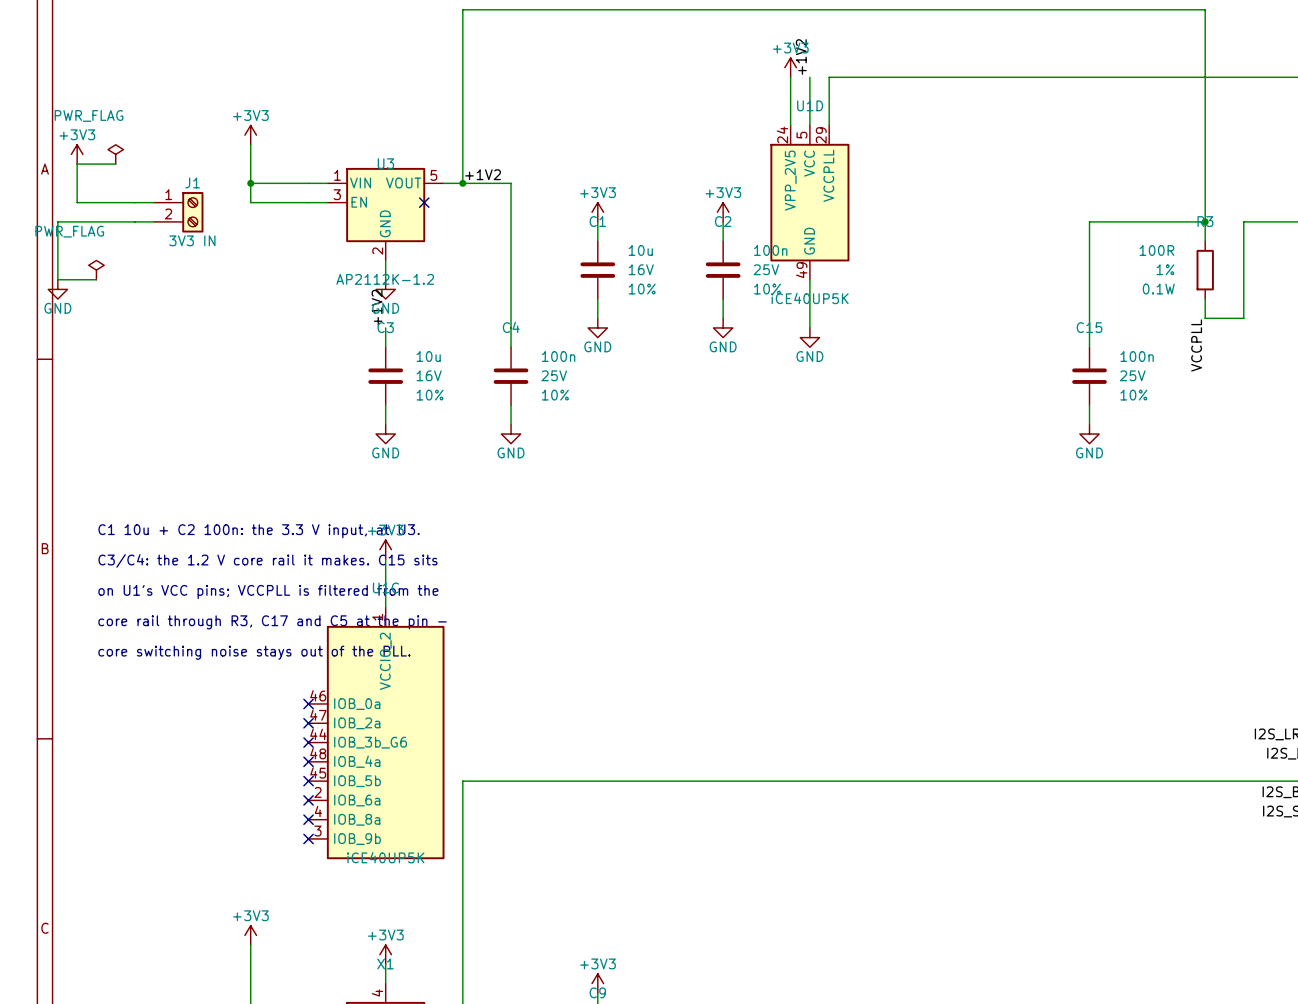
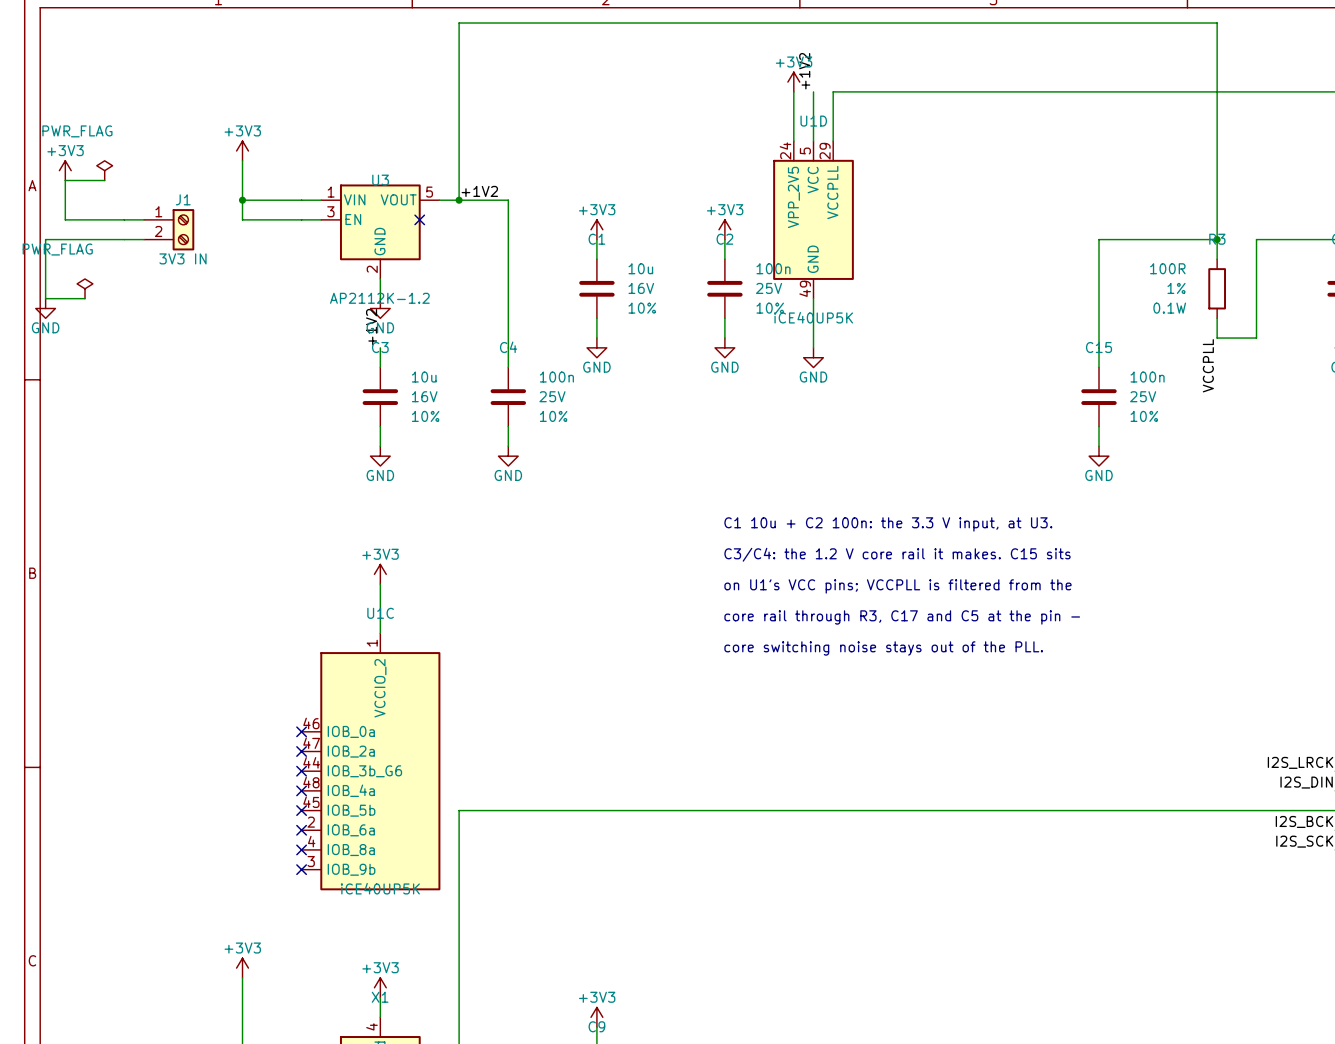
text: none -> C1 10u + C2 100n: the 3.3 V input, at U3. (888, 524)
text: none -> C3/C4: the 1.2 V core rail it makes. C15 sits (897, 554)
text: C1 10u + C2 100n: the 3.3 V input, at U3. (259, 531) -> none
text: C3/C4: the 1.2 V core rail it makes. C15 sits (267, 560) -> none
text: none -> on U1's VCC pins; VCCPLL is filtered from the (897, 586)
text: on U1's VCC pins; VCCPLL is filtered from the (268, 591) -> none
text: none -> core rail through R3, C17 and C5 at the pin - (902, 617)
text: core rail through R3, C17 and C5 at the pin - (272, 622) -> none
text: none -> core switching noise stays out of the PLL. (883, 648)
text: core switching noise stays out of the PLL. (254, 652) -> none

